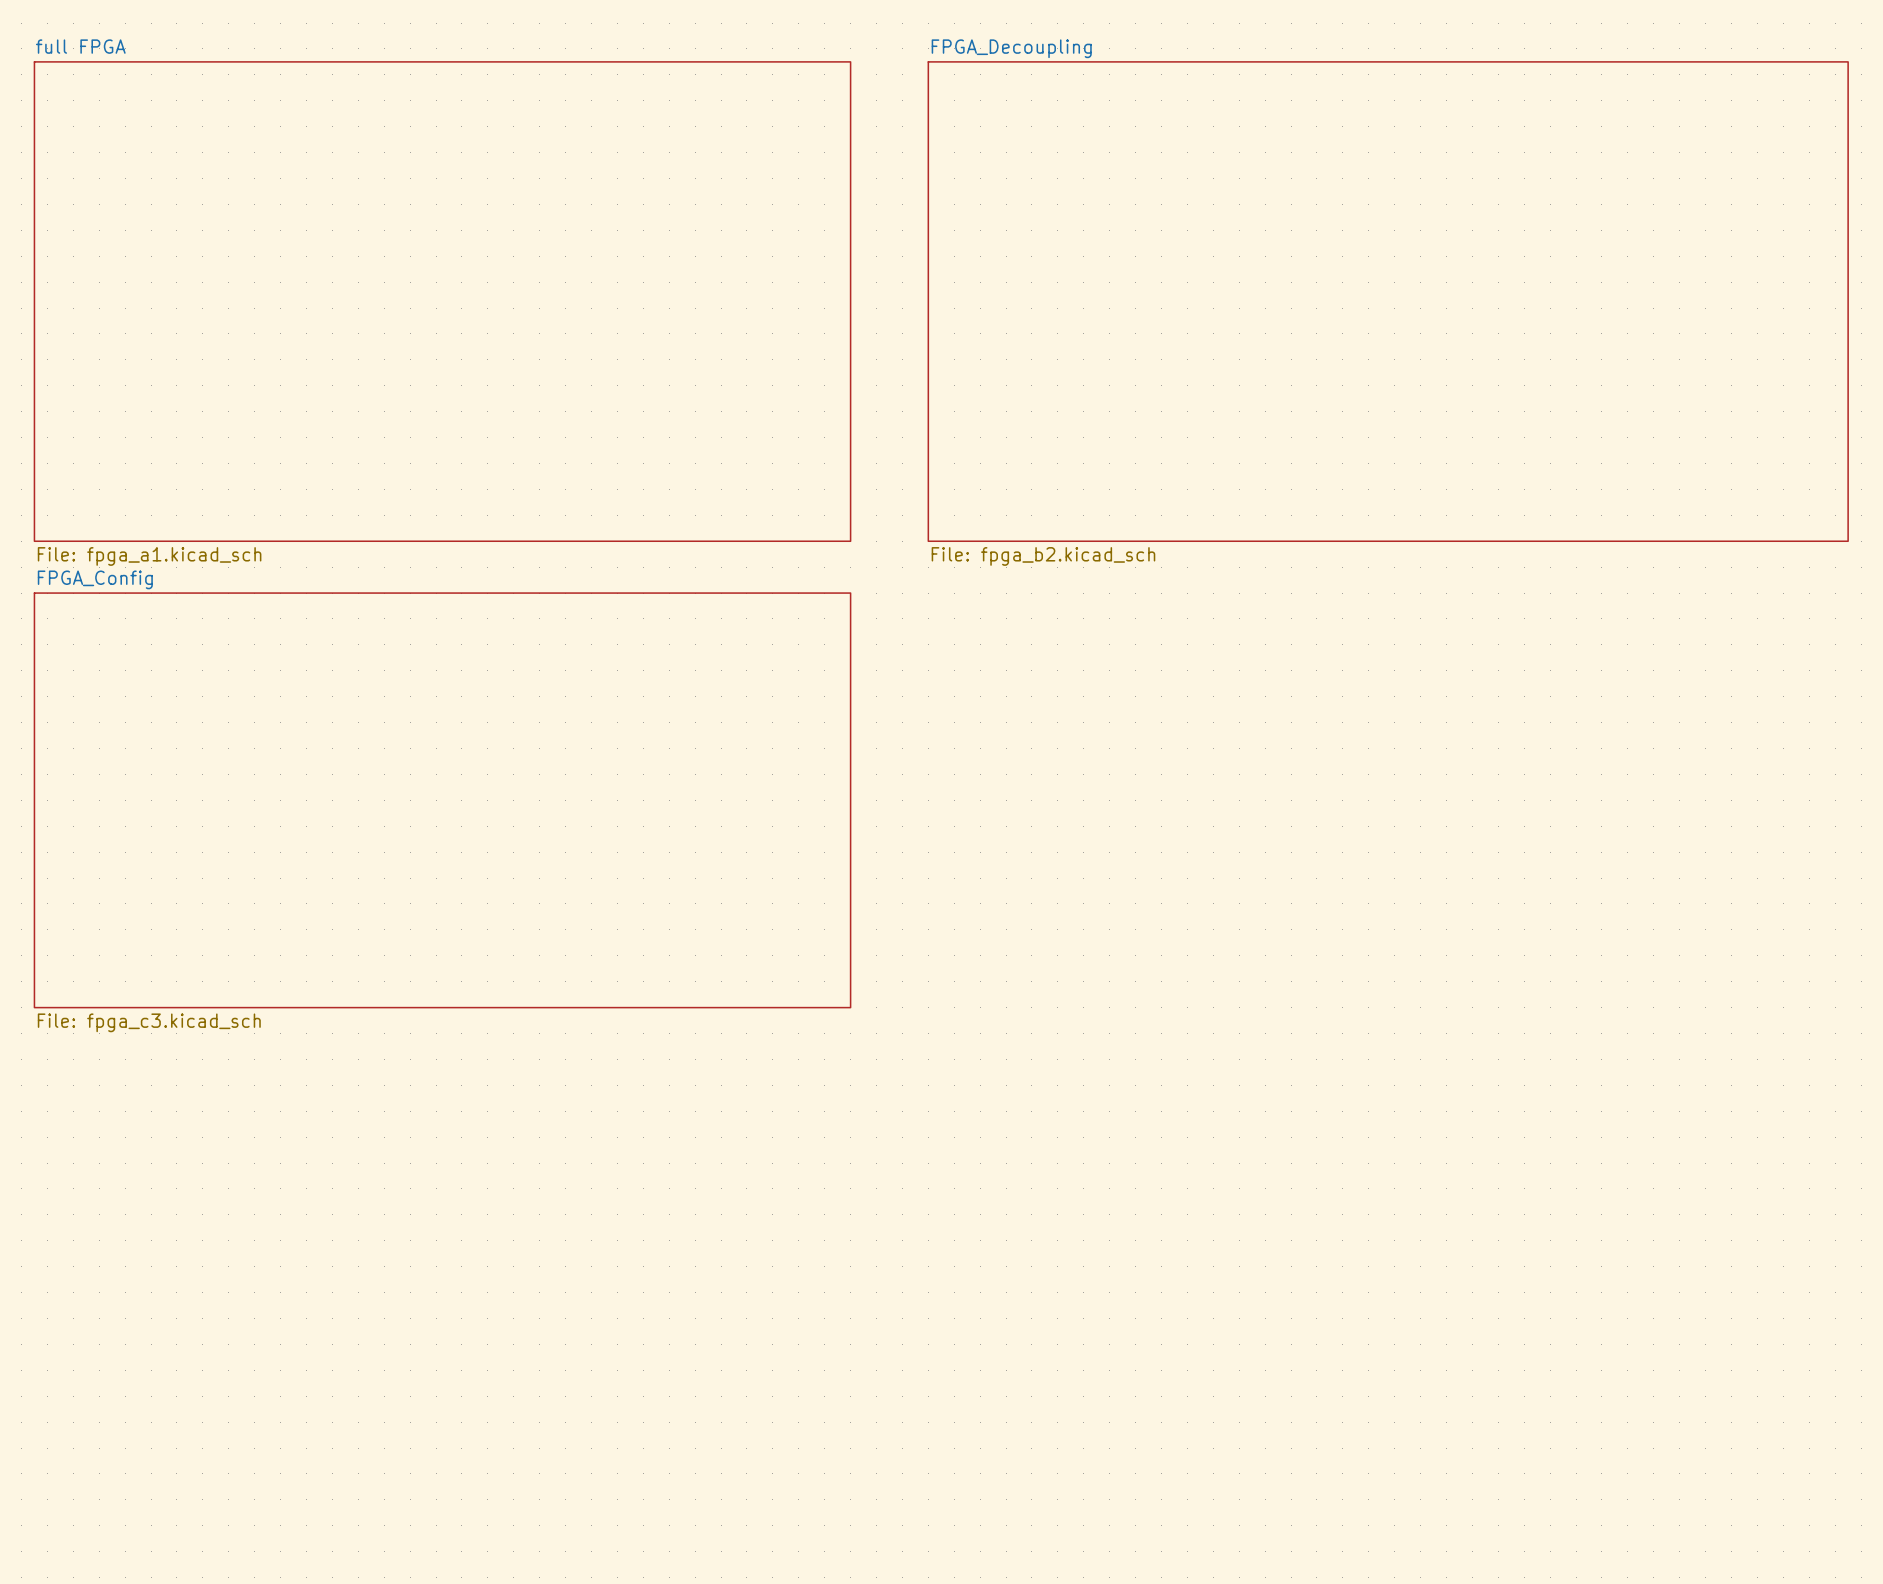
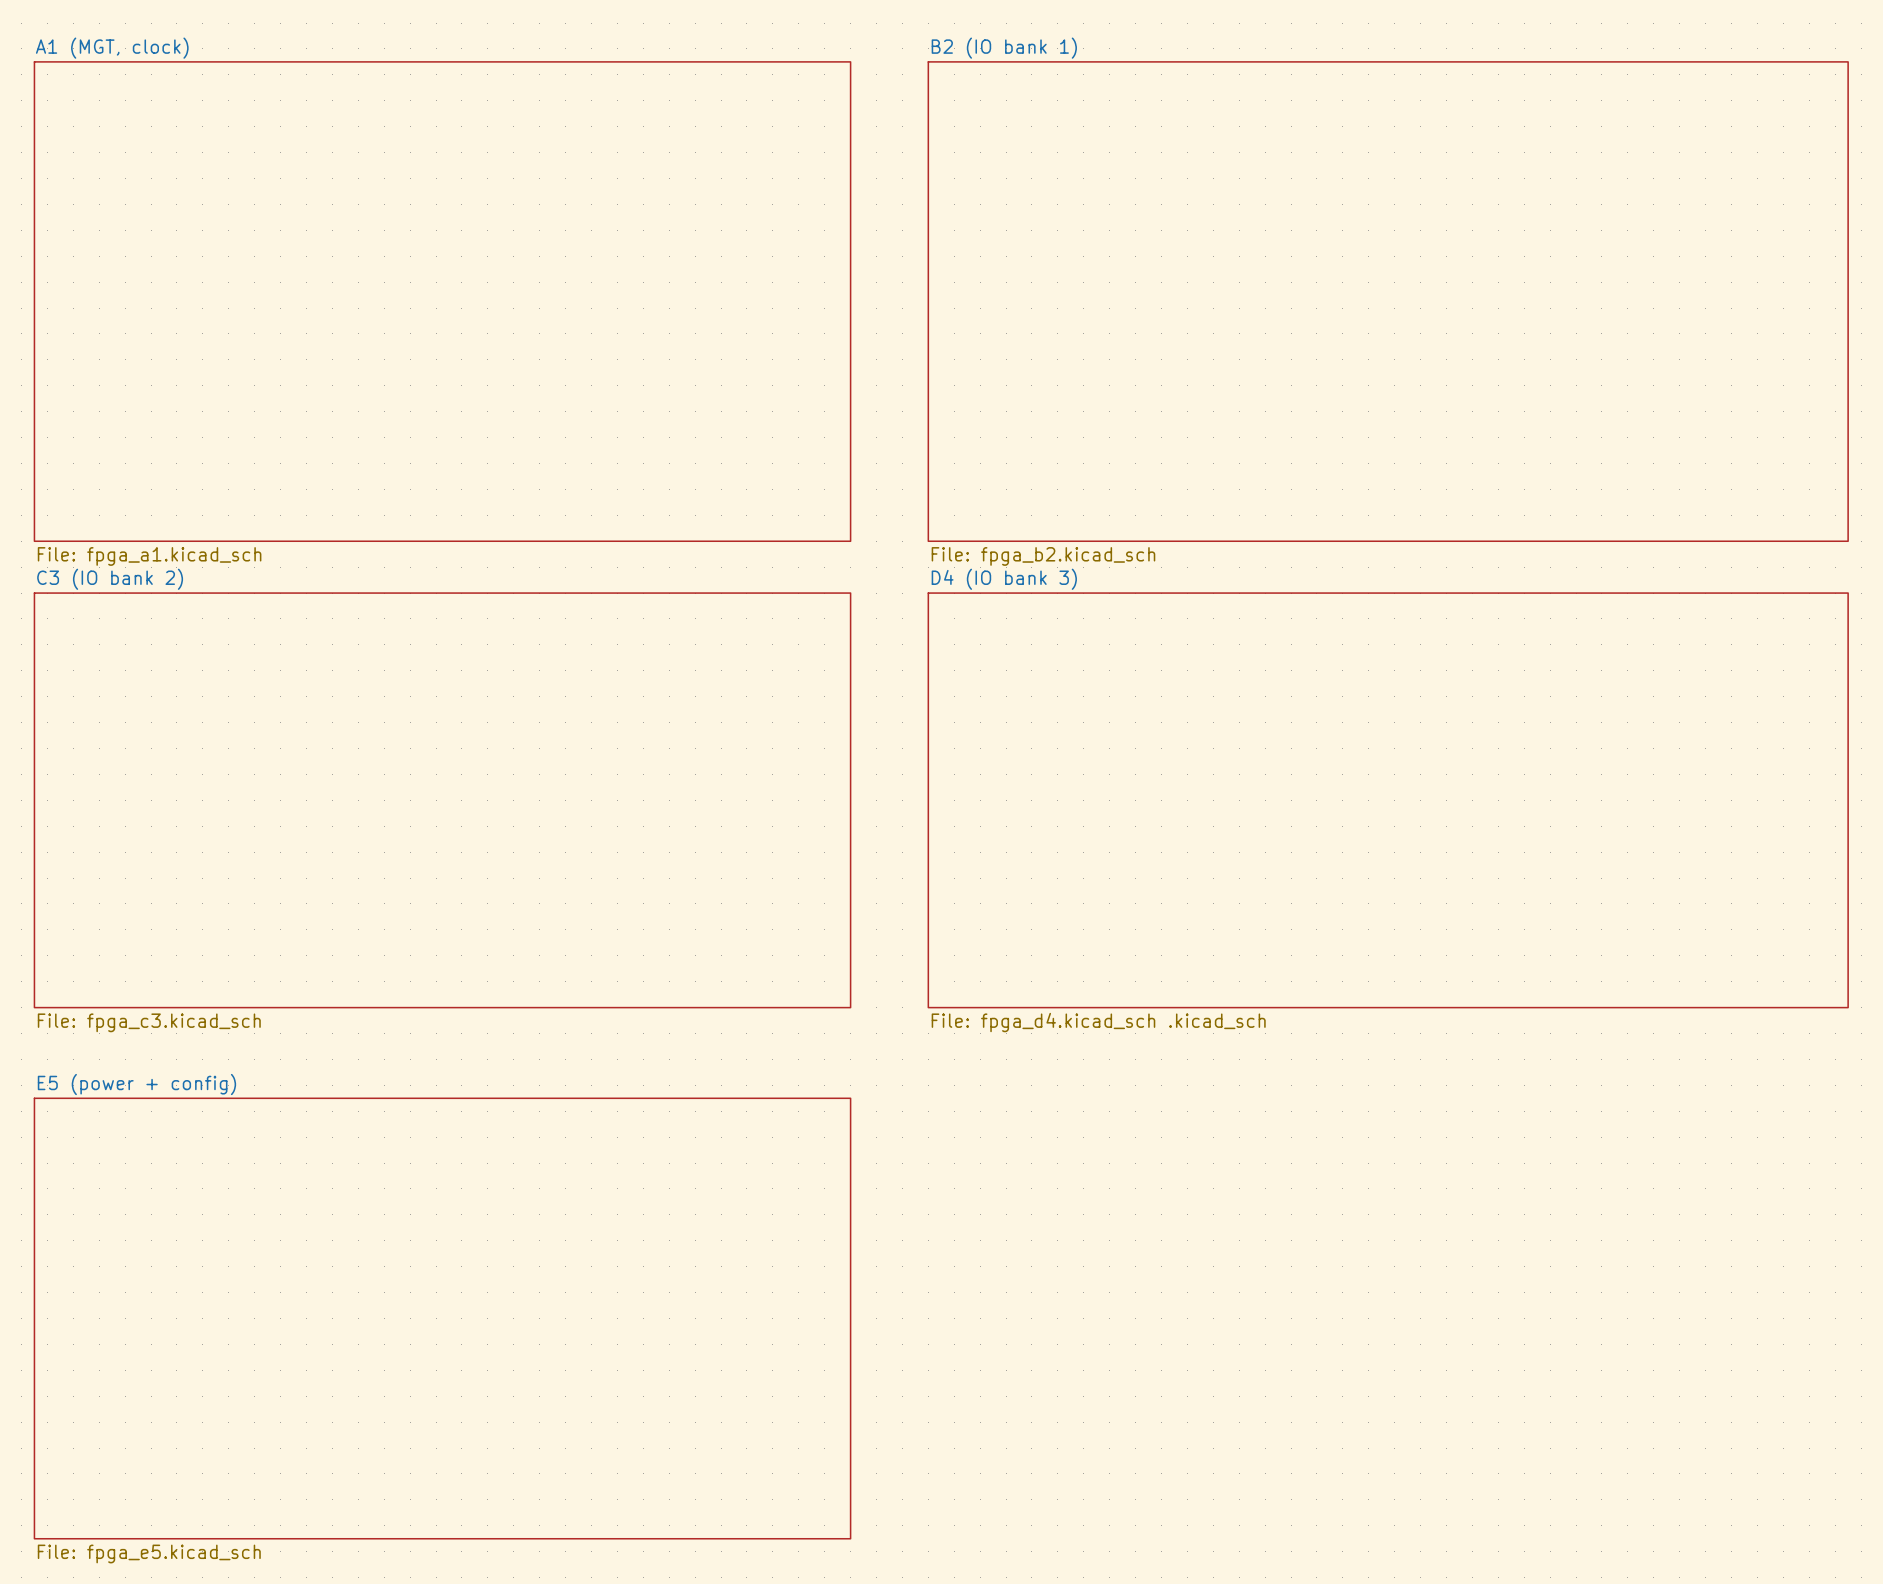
sheet full FPGA name: full FPGA (80, 46) -> A1 (MGT, clock) (112, 48)
sheet FPGA_Decoupling name: FPGA_Decoupling (1011, 48) -> B2 (IO bank 1) (1004, 48)
sheet FPGA_Config name: FPGA_Config (95, 579) -> C3 (IO bank 2) (110, 579)
sheet D4 (IO bank 3): none -> File: fpga_d4.kicad_sch .kicad_sch (1388, 800)
sheet E5 (power + config): none -> File: fpga_e5.kicad_sch (442, 1318)

